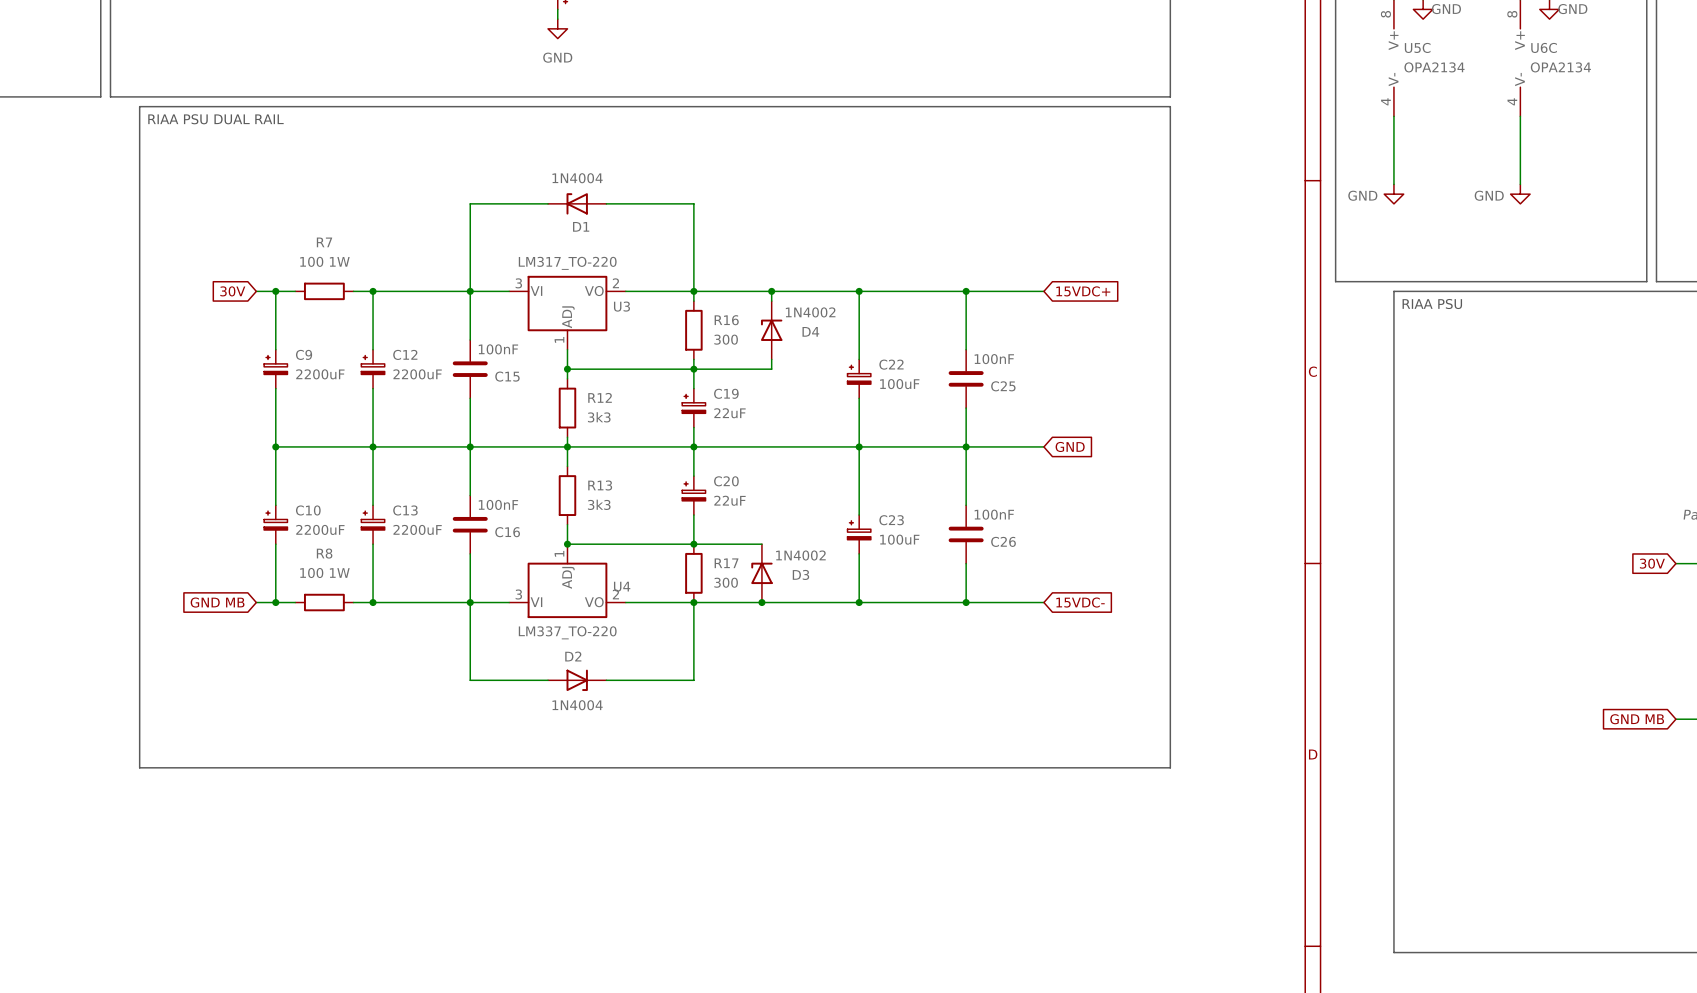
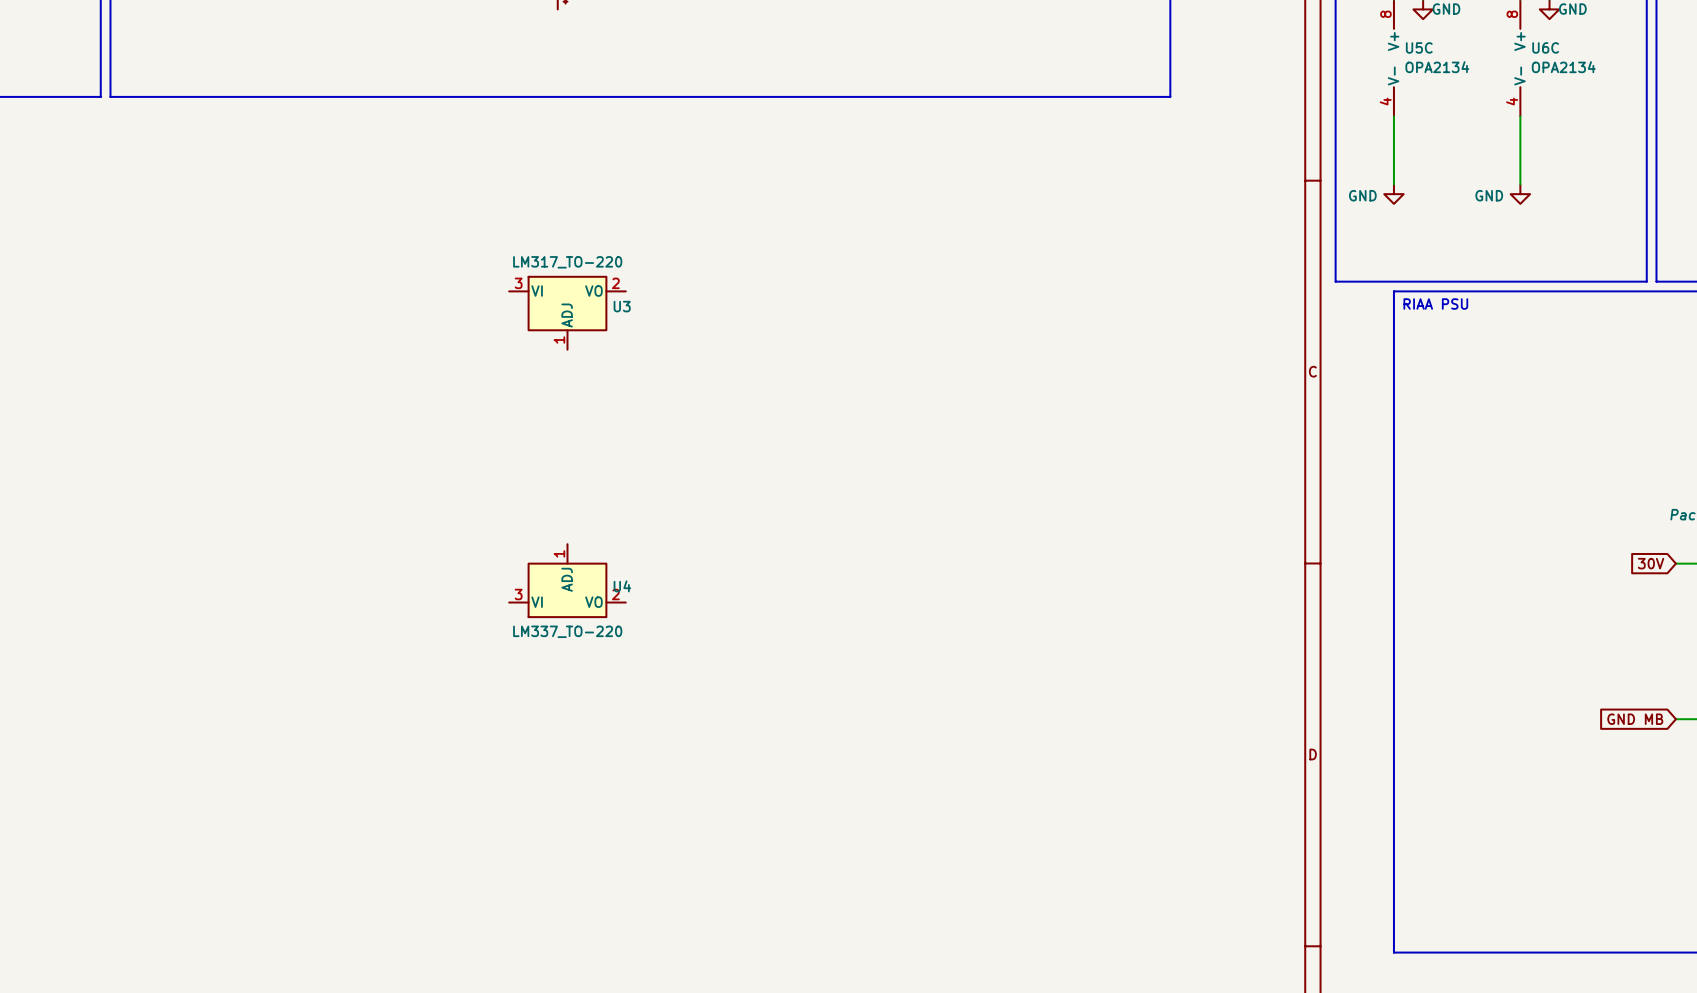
wire: (557, 9) (557, 19) -> none
power symbol: GND (557, 28) -> none
line: (139, 106) (1170, 106) (1170, 767) (139, 767) (139, 106) -> none
text: RIAA PSU DUAL RAIL (215, 119) -> none
wire: (548, 203) (470, 203) (470, 340) -> none
D1: 1N4004 (577, 203) -> none
wire: (606, 203) (693, 203) (693, 301) -> none
global label: 30V (232, 291) -> none
wire: (256, 291) (295, 291) -> none
wire: (275, 291) (275, 349) -> none
junction: (275, 291) -> none
R7: 100 1W (324, 291) -> none
wire: (353, 291) (509, 291) -> none
wire: (373, 291) (373, 349) -> none
junction: (373, 291) -> none
junction: (470, 291) -> none
wire: (625, 291) (1043, 291) -> none
junction: (693, 291) -> none
wire: (771, 291) (771, 301) -> none
junction: (771, 291) -> none
wire: (859, 291) (859, 359) -> none
junction: (859, 291) -> none
wire: (966, 291) (966, 349) -> none
junction: (966, 291) -> none
global label: 15VDC+ (1083, 291) -> none
R16: 300 (693, 330) -> none
D4: 1N4002 (771, 330) -> none
wire: (567, 349) (567, 378) -> none
wire: (693, 359) (693, 388) -> none
wire: (771, 359) (771, 369) (567, 369) -> none
C9: 2200uF (275, 369) -> none
C12: 2200uF (373, 369) -> none
C15: 100nF (470, 369) -> none
junction: (567, 369) -> none
junction: (693, 369) -> none
C22: 100uF (859, 378) -> none
C25: 100nF (966, 378) -> none
wire: (275, 388) (275, 505) -> none
wire: (373, 388) (373, 505) -> none
wire: (470, 398) (470, 495) -> none
wire: (859, 398) (859, 515) -> none
R12: 3k3 (567, 408) -> none
C19: 22uF (693, 408) -> none
wire: (966, 408) (966, 505) -> none
wire: (693, 427) (693, 476) -> none
wire: (567, 437) (567, 466) -> none
wire: (275, 446) (1043, 446) -> none
junction: (275, 446) -> none
junction: (373, 446) -> none
junction: (470, 446) -> none
junction: (567, 446) -> none
junction: (693, 446) -> none
junction: (859, 446) -> none
junction: (966, 446) -> none
global label: GND (1070, 446) -> none
R13: 3k3 (567, 495) -> none
C20: 22uF (693, 495) -> none
wire: (693, 515) (693, 544) -> none
C10: 2200uF (275, 524) -> none
C13: 2200uF (373, 524) -> none
C16: 100nF (470, 524) -> none
wire: (567, 524) (567, 544) (761, 544) -> none
C23: 100uF (859, 534) -> none
C26: 100nF (966, 534) -> none
wire: (275, 544) (275, 602) -> none
wire: (373, 544) (373, 602) -> none
junction: (567, 544) -> none
junction: (693, 544) -> none
wire: (470, 553) (470, 680) (548, 680) -> none
wire: (859, 553) (859, 602) -> none
wire: (966, 563) (966, 602) -> none
R17: 300 (693, 573) -> none
D3: 1N4002 (761, 573) -> none
global label: GND MB (217, 602) -> none
wire: (256, 602) (295, 602) -> none
junction: (275, 602) -> none
R8: 100 1W (324, 602) -> none
wire: (353, 602) (509, 602) -> none
junction: (373, 602) -> none
junction: (470, 602) -> none
wire: (625, 602) (1043, 602) -> none
wire: (693, 602) (693, 680) (606, 680) -> none
junction: (693, 602) -> none
junction: (761, 602) -> none
junction: (859, 602) -> none
junction: (966, 602) -> none
global label: 15VDC- (1080, 602) -> none
D2: 1N4004 (577, 680) -> none

